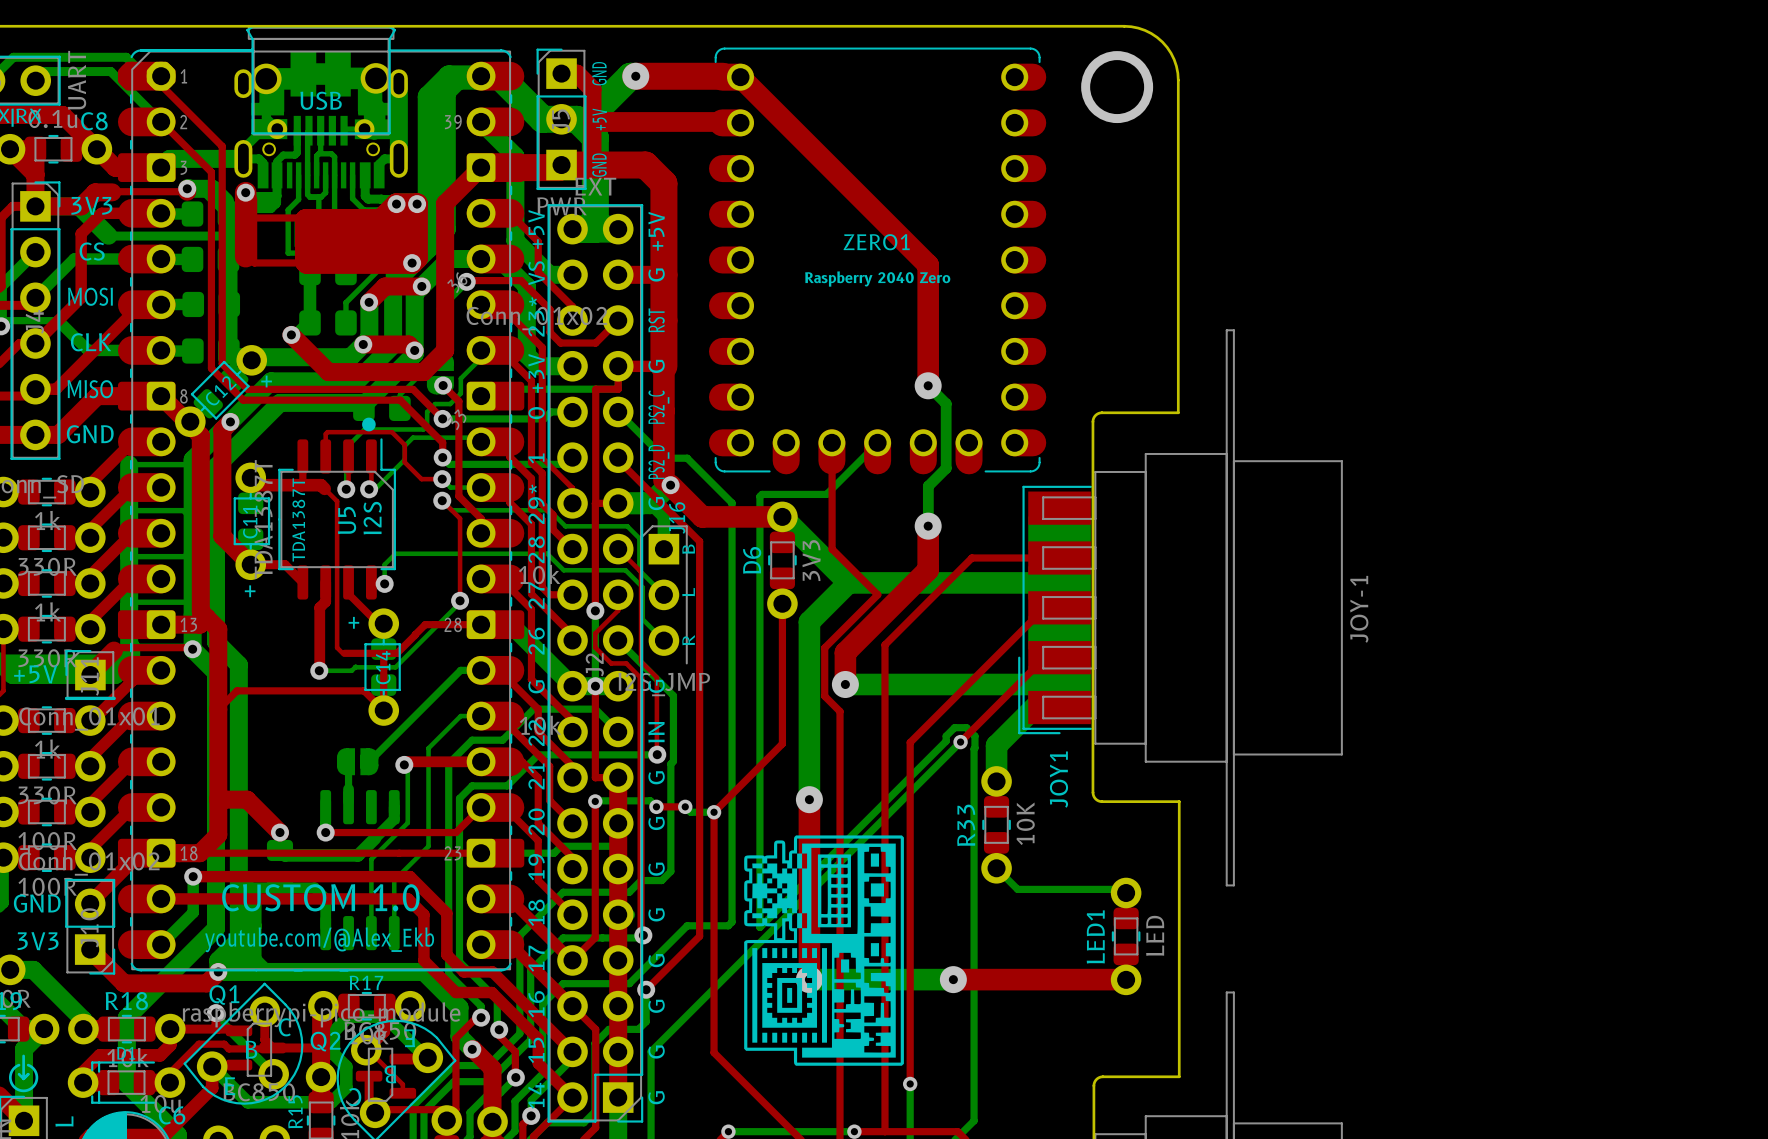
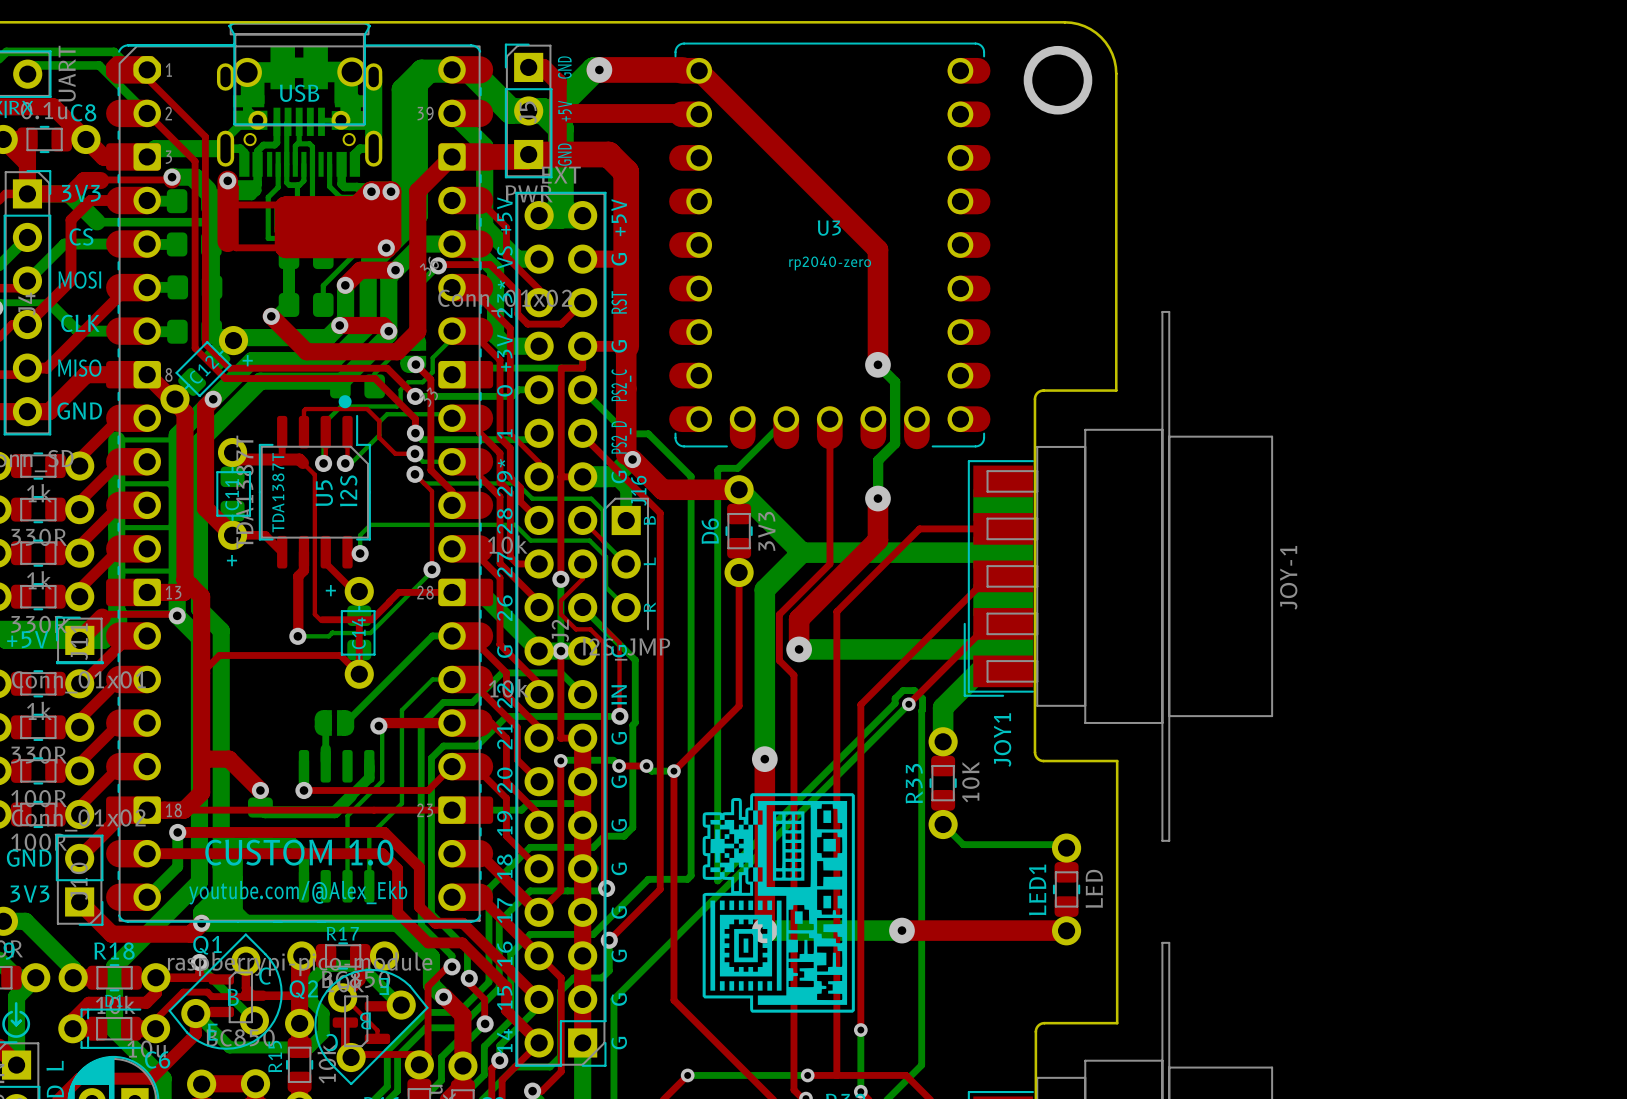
ZERO1 name: ZERO1 (876, 242) -> U3 (829, 228)
ZERO1 value: Raspberry 2040 Zero (877, 279) -> rp2040-zero (830, 263)
top track: (832, 443) (832, 549) (877, 594) -> (829, 419) (829, 564)
bottom track: (877, 443) (826, 494) (780, 494) -> (786, 419) (737, 468)

